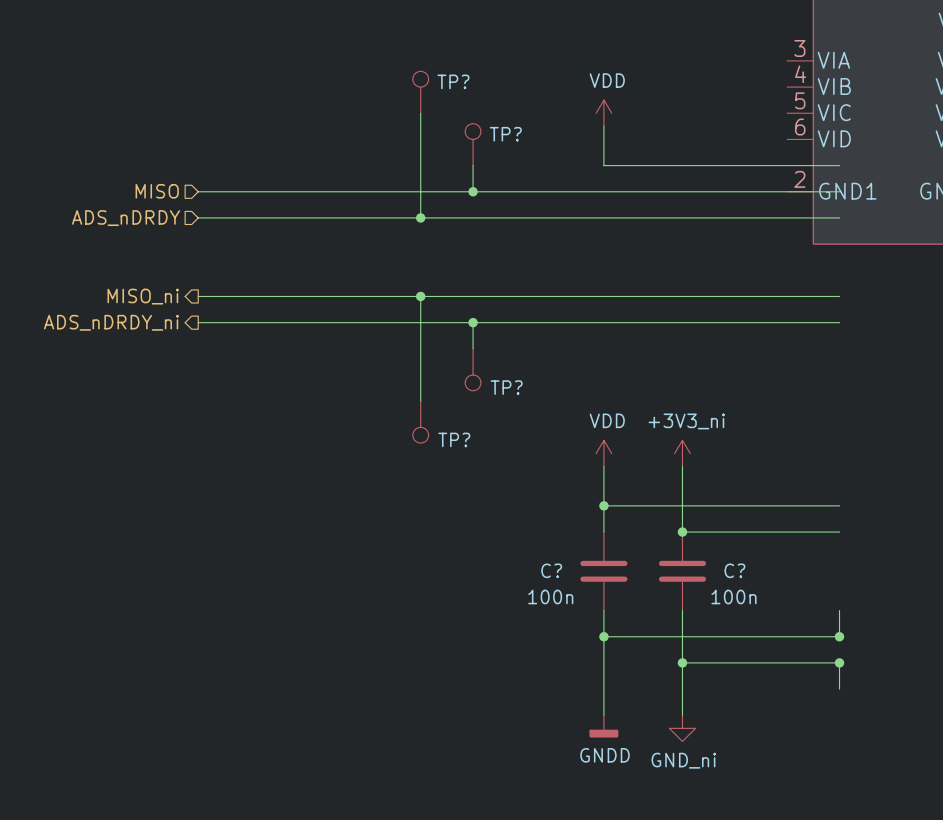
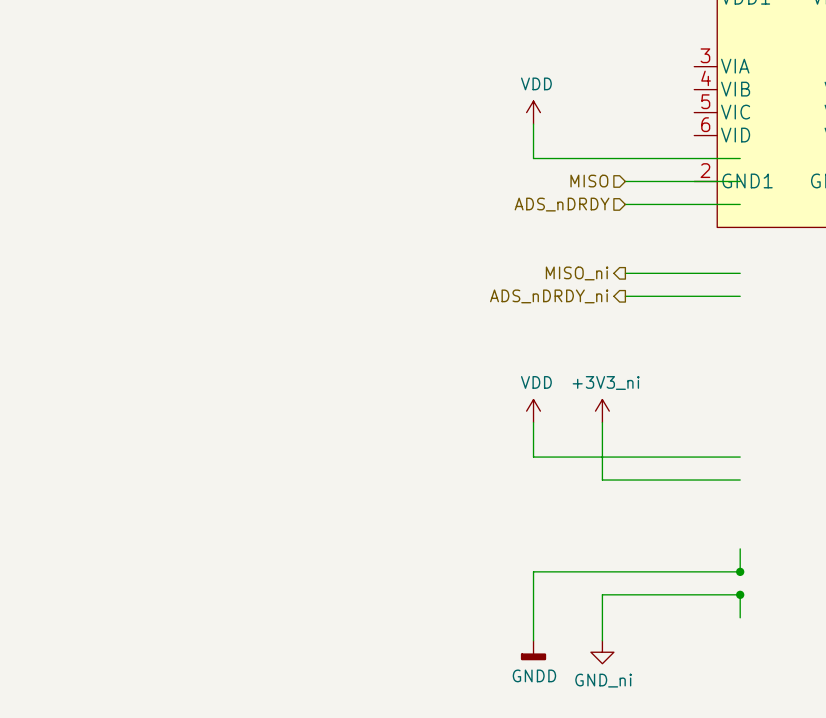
TP?: (420, 92) -> none
wire: (420, 113) (420, 217) -> none
TP?: (473, 144) -> none
wire: (473, 165) (473, 191) -> none
hierarchical label: MISO (157, 191) -> none
wire: (198, 191) (708, 191) -> none
junction: (473, 191) -> none
hierarchical label: none -> MISO (589, 181)
wire: (198, 217) (708, 217) -> none
junction: (420, 217) -> none
hierarchical label: ADS_nDRDY (126, 218) -> none
hierarchical label: none -> ADS_nDRDY (562, 204)
hierarchical label: MISO_ni (143, 296) -> none
wire: (198, 296) (708, 296) -> none
wire: (420, 296) (420, 401) -> none
junction: (420, 296) -> none
hierarchical label: none -> MISO_ni (577, 273)
hierarchical label: ADS_nDRDY_ni (111, 322) -> none
wire: (198, 322) (708, 322) -> none
wire: (473, 322) (473, 348) -> none
junction: (473, 322) -> none
hierarchical label: none -> ADS_nDRDY_ni (549, 296)
TP?: (473, 369) -> none
TP?: (420, 422) -> none
wire: (603, 505) (603, 532) -> none
junction: (603, 505) -> none
junction: (682, 532) -> none
C?: 100n (603, 571) -> none
C?: 100n (682, 571) -> none
wire: (603, 610) (603, 636) -> none
wire: (682, 610) (682, 662) -> none
junction: (603, 636) -> none
junction: (682, 662) -> none

